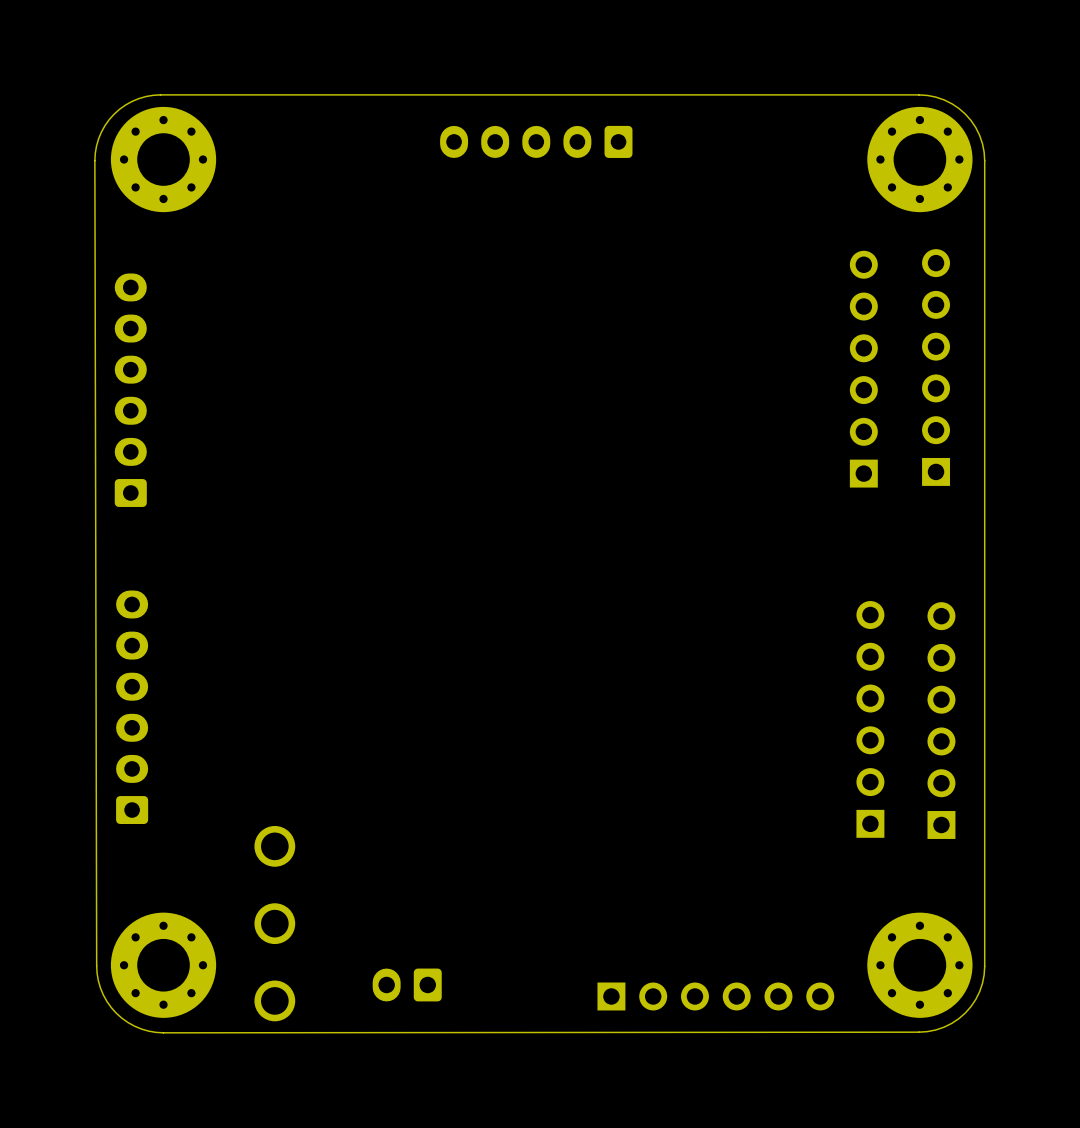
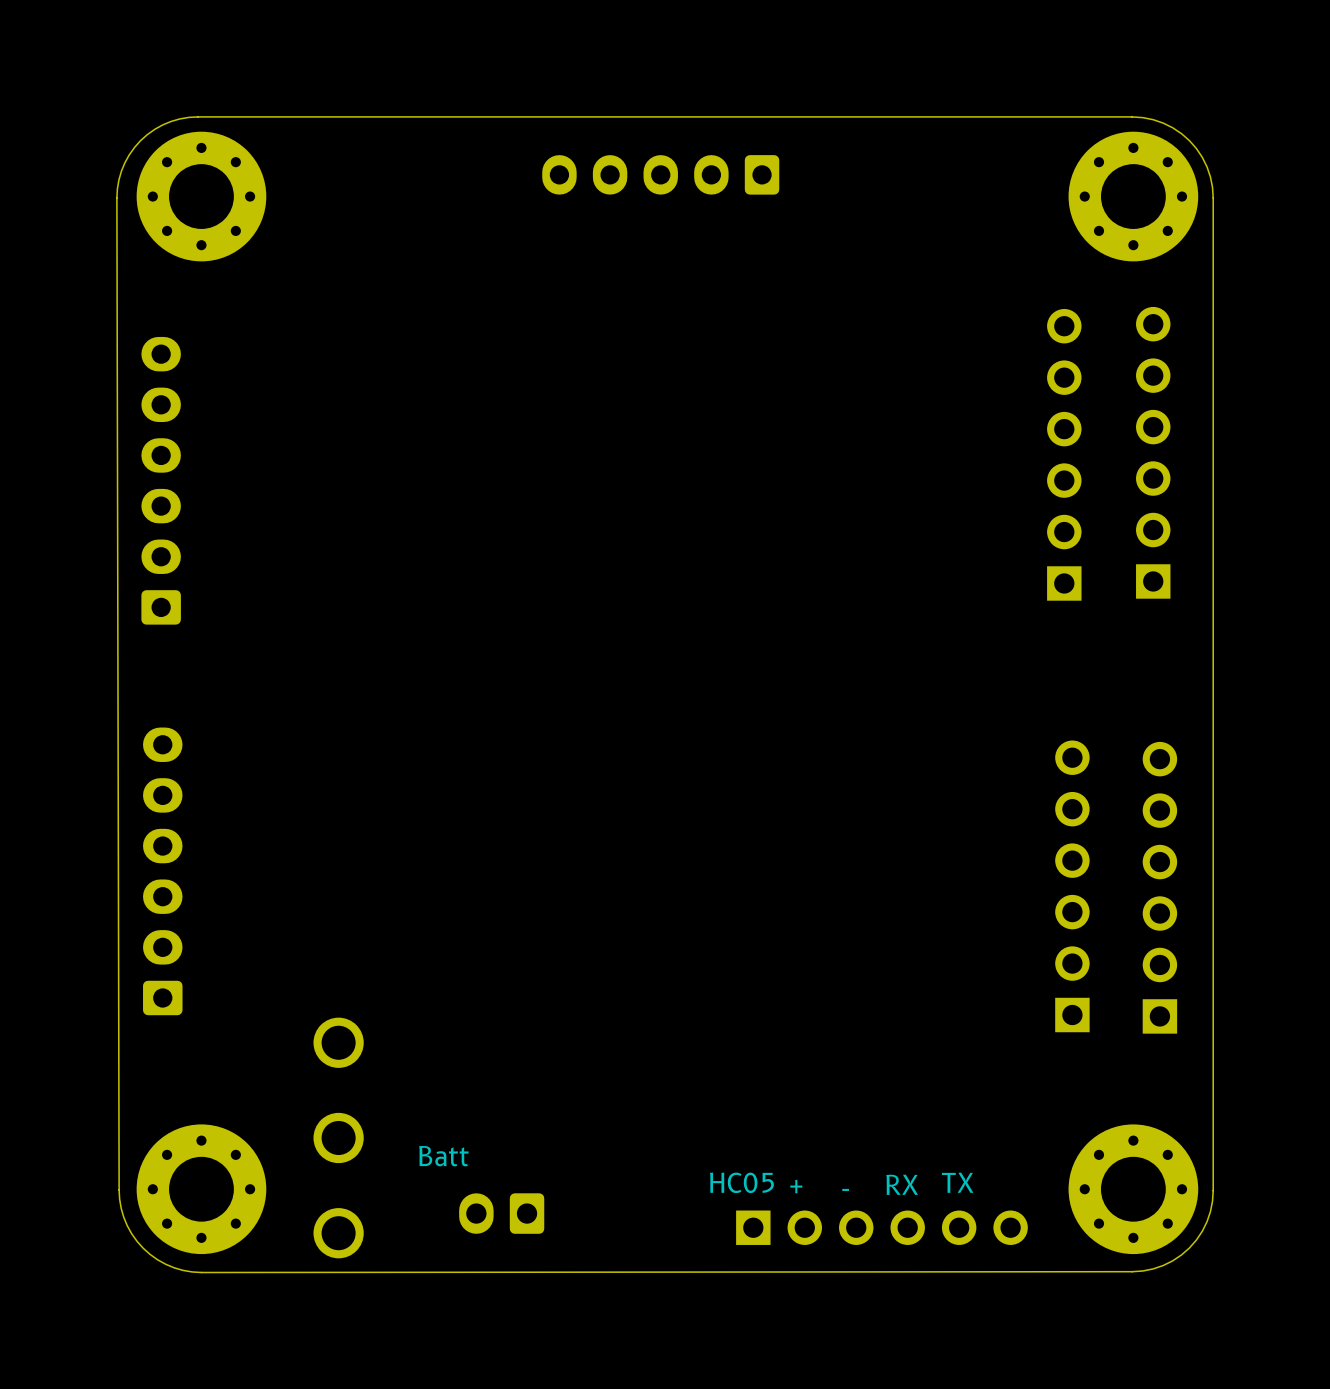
text: none -> Batt (443, 1156)
text: none -> HC05 (741, 1182)
text: none -> TX (957, 1182)
text: none -> RX (902, 1184)
text: none -> + (796, 1186)
text: none -> - (845, 1189)

